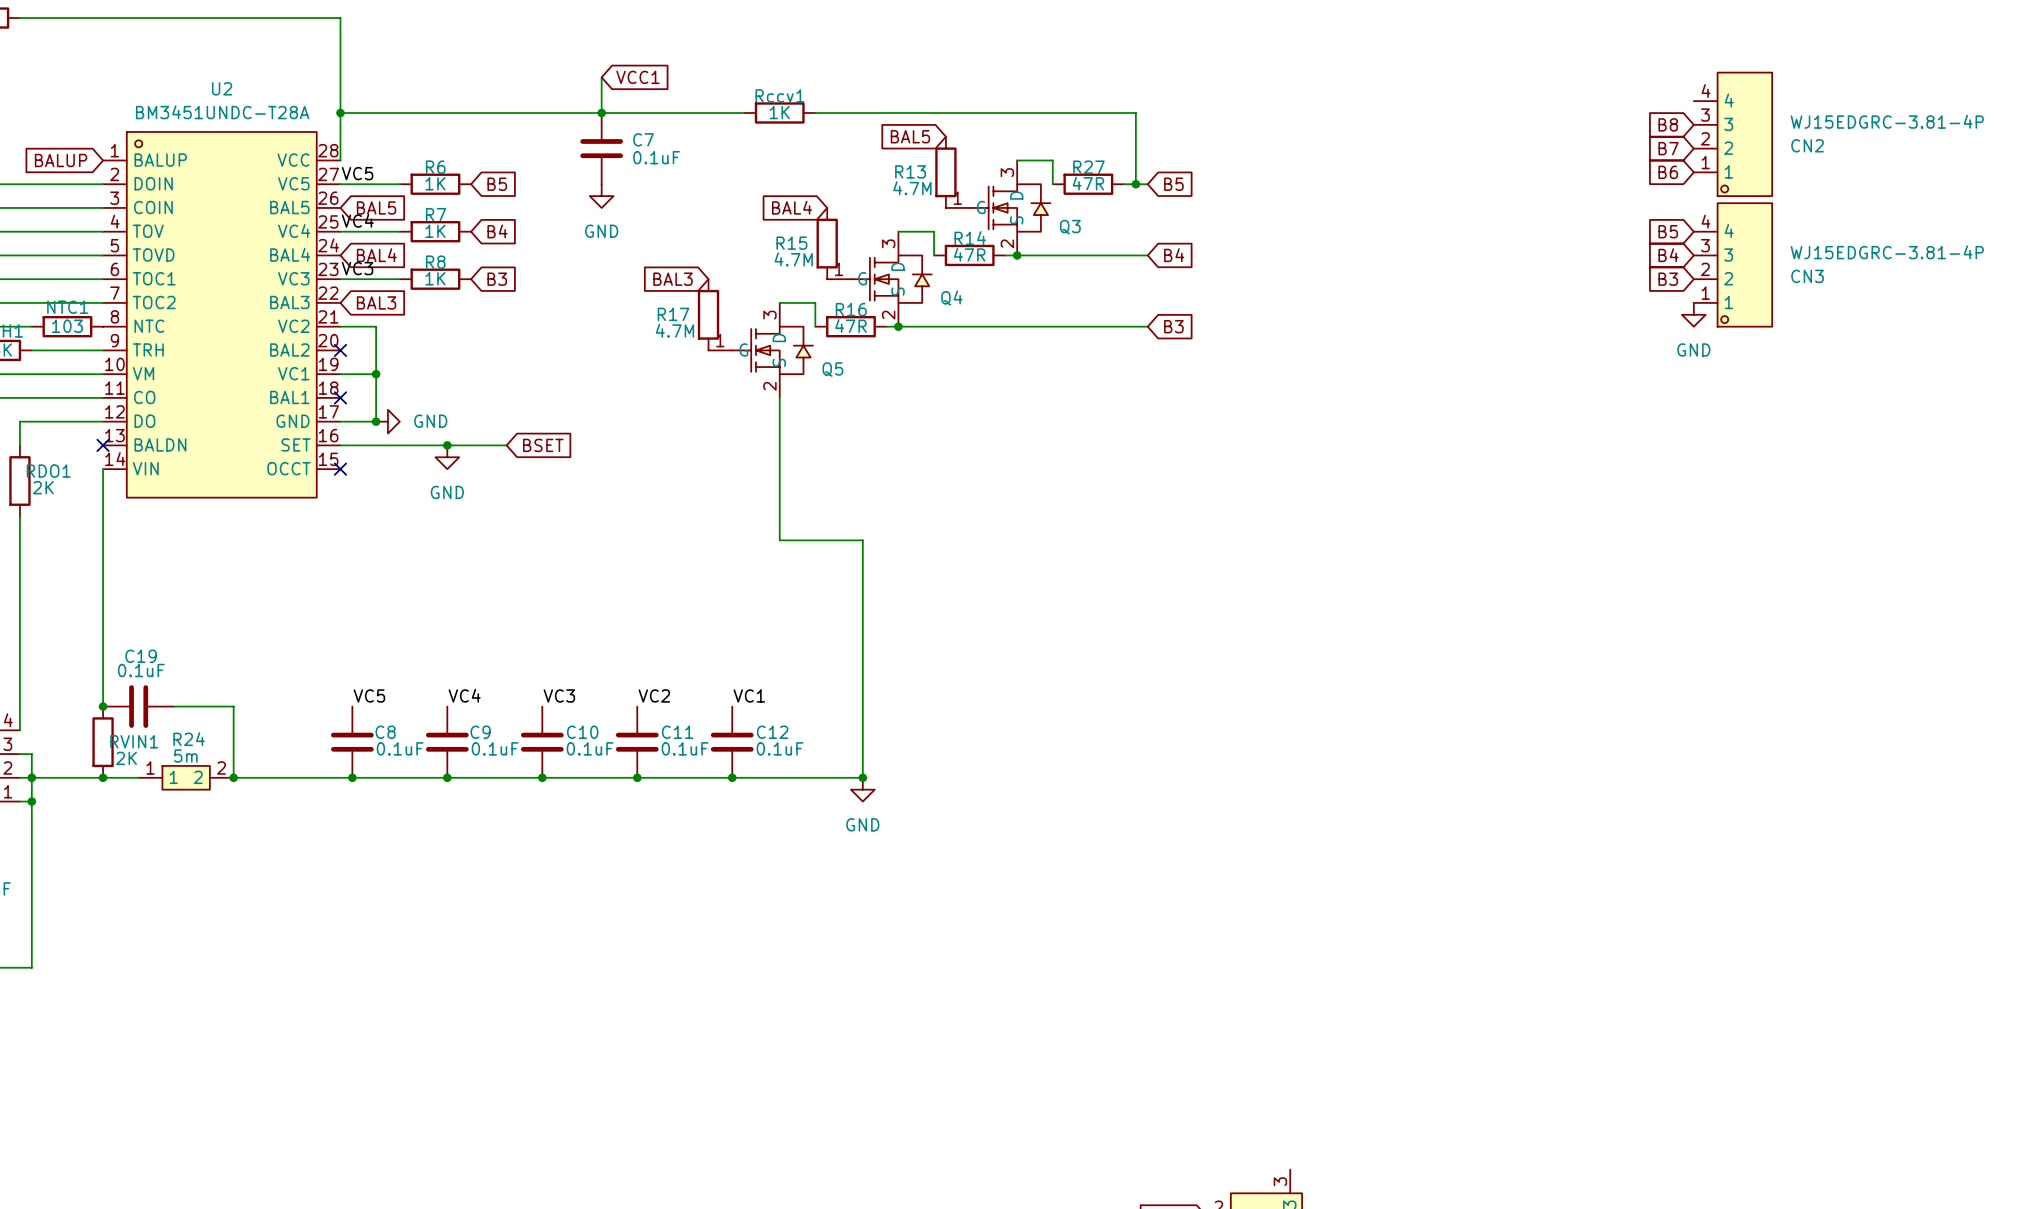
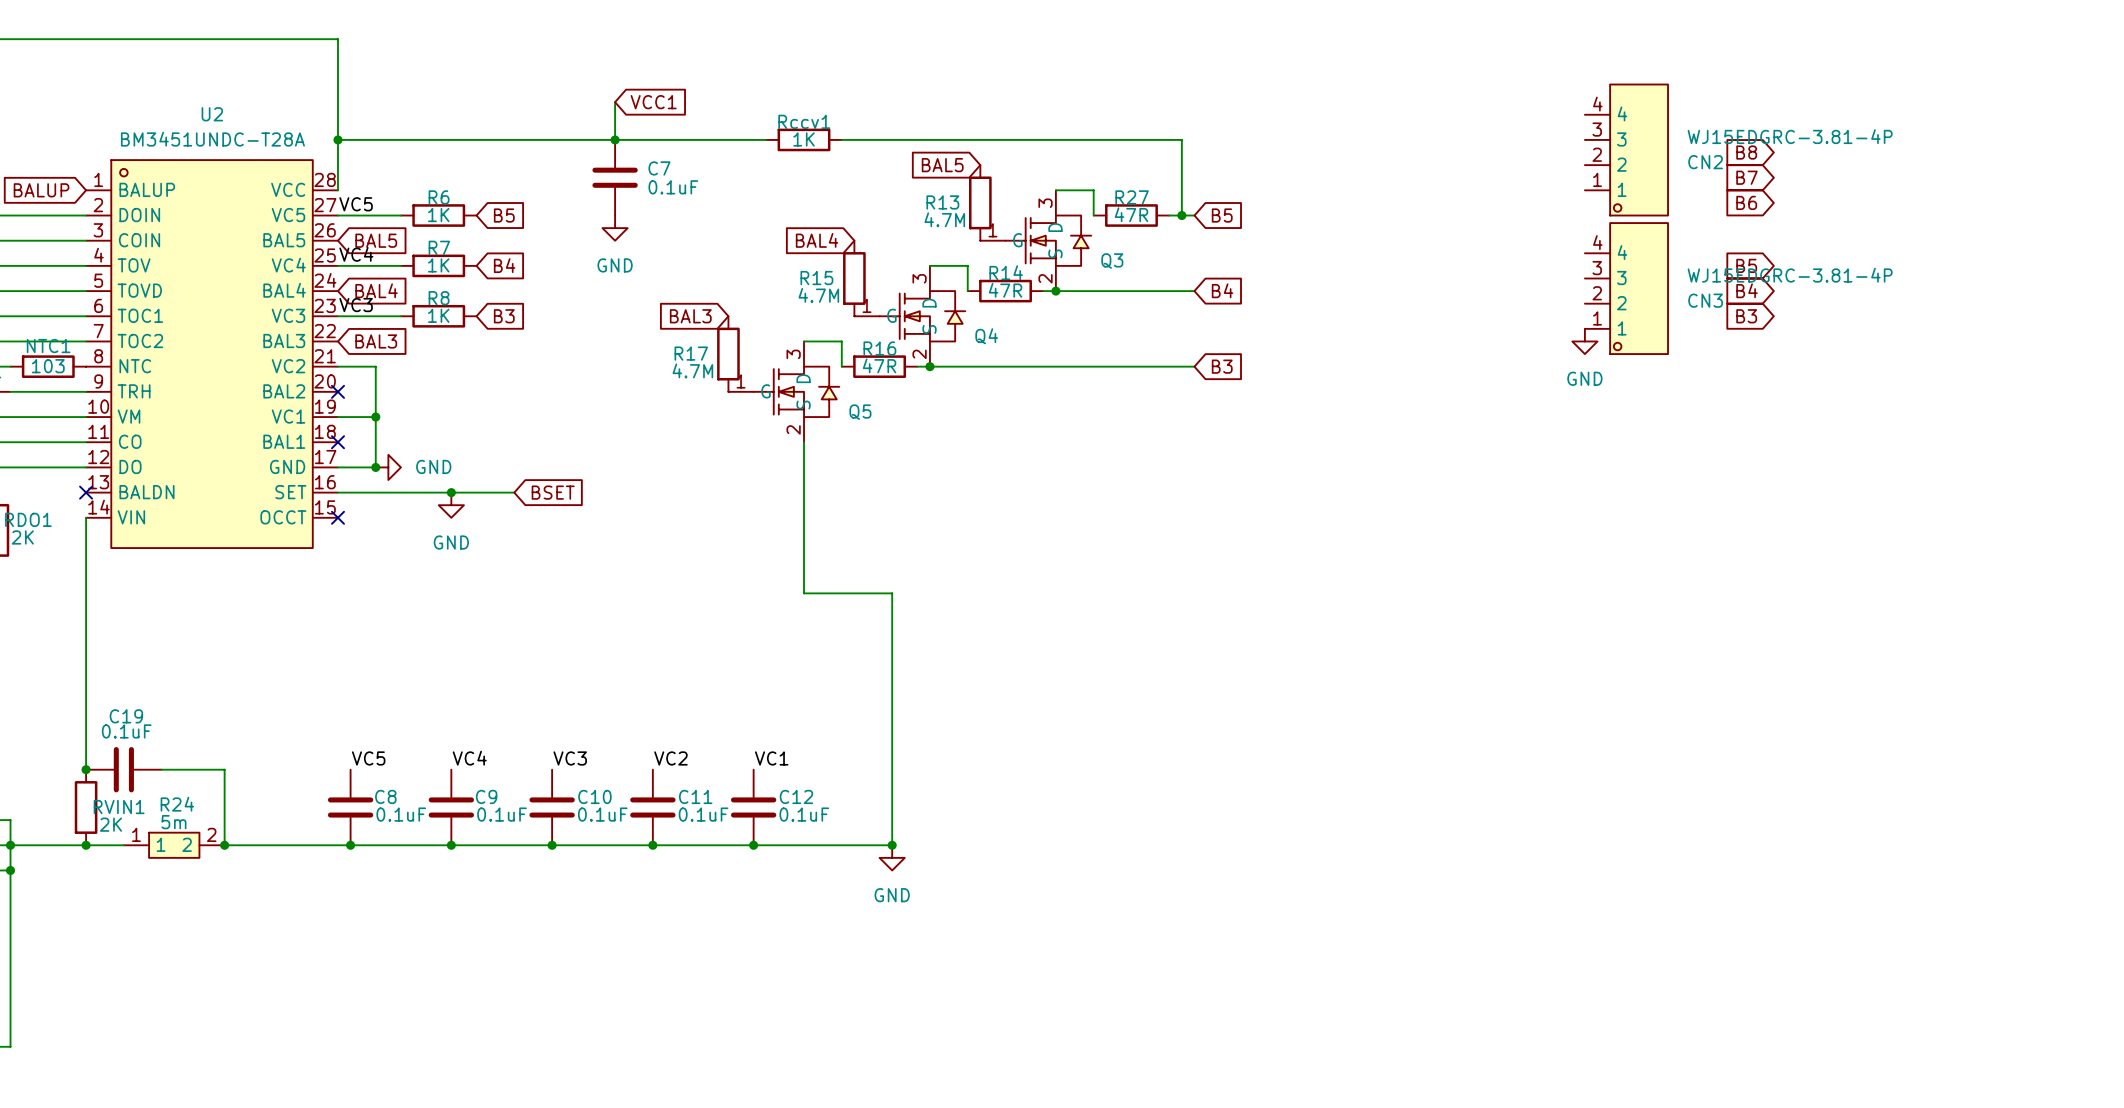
CN2 position: (1733, 134) -> (1626, 150)
CN3 position: (1733, 264) -> (1626, 288)
power symbol position: GND (1693, 314) -> GND (1584, 341)

